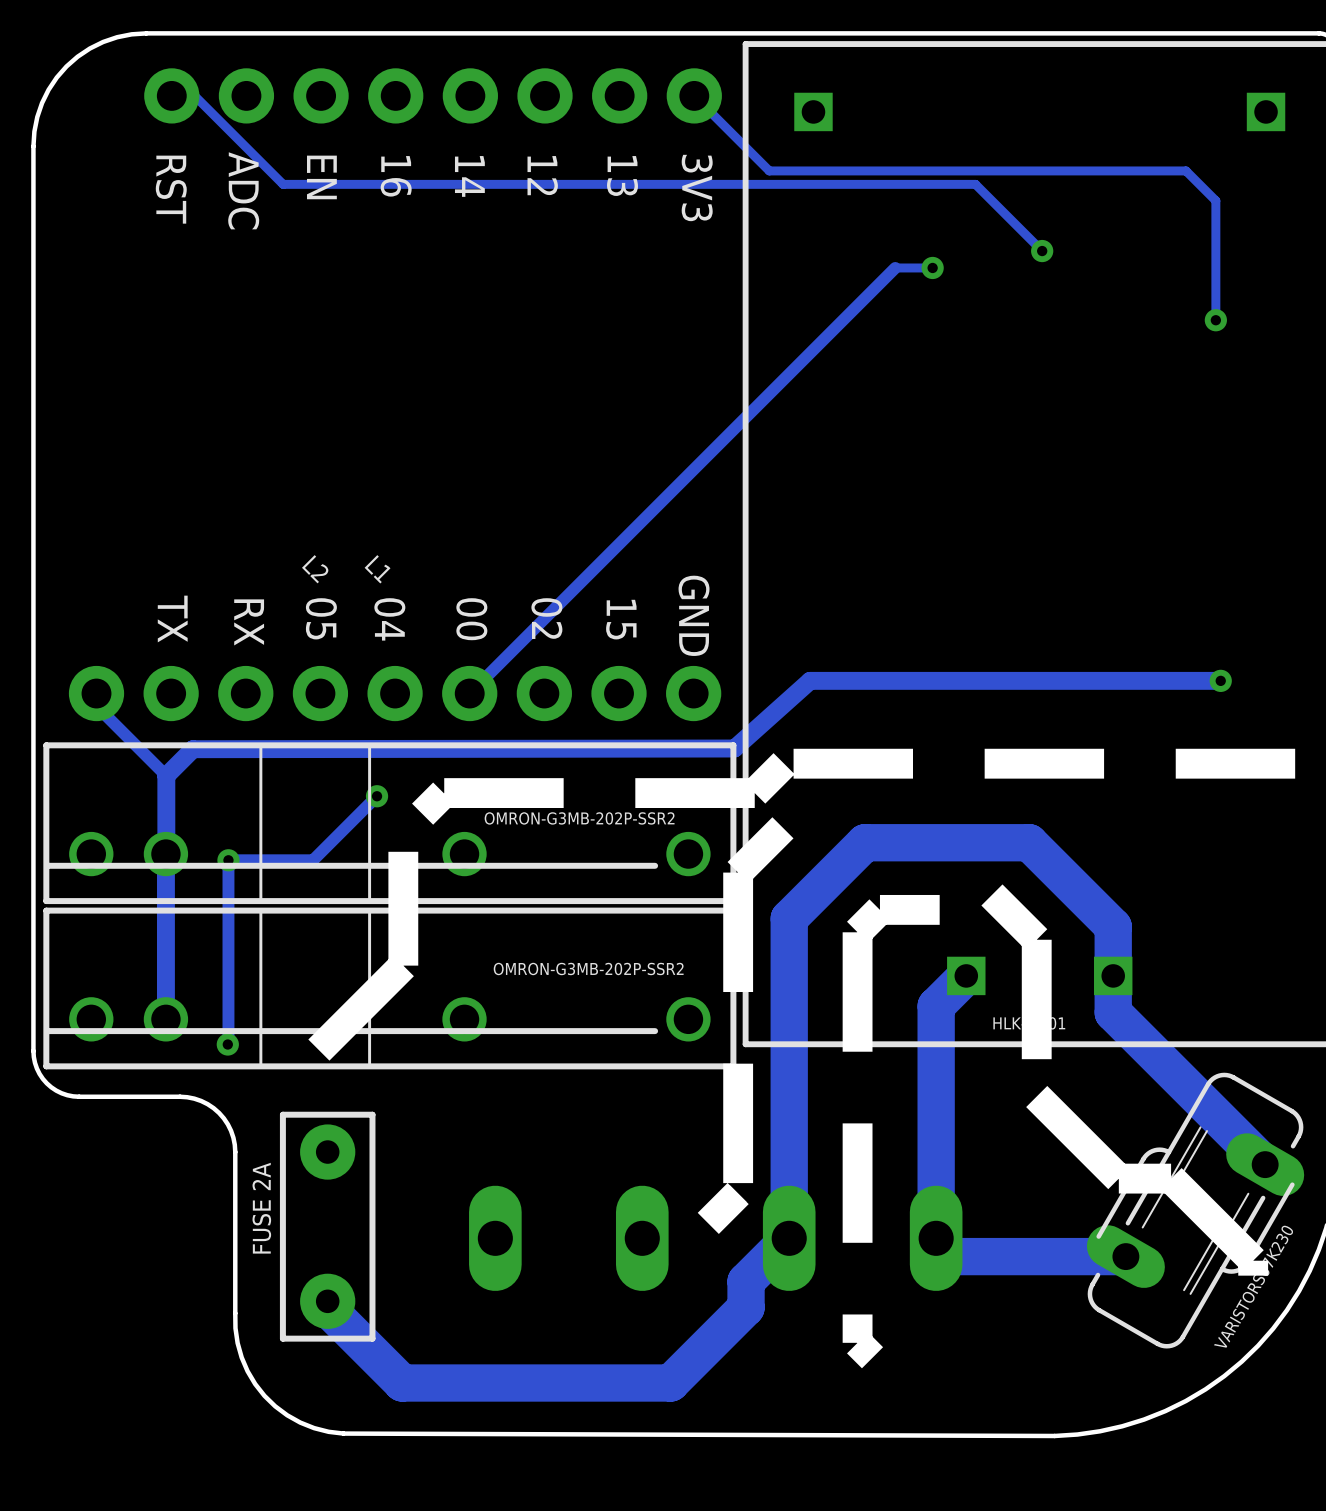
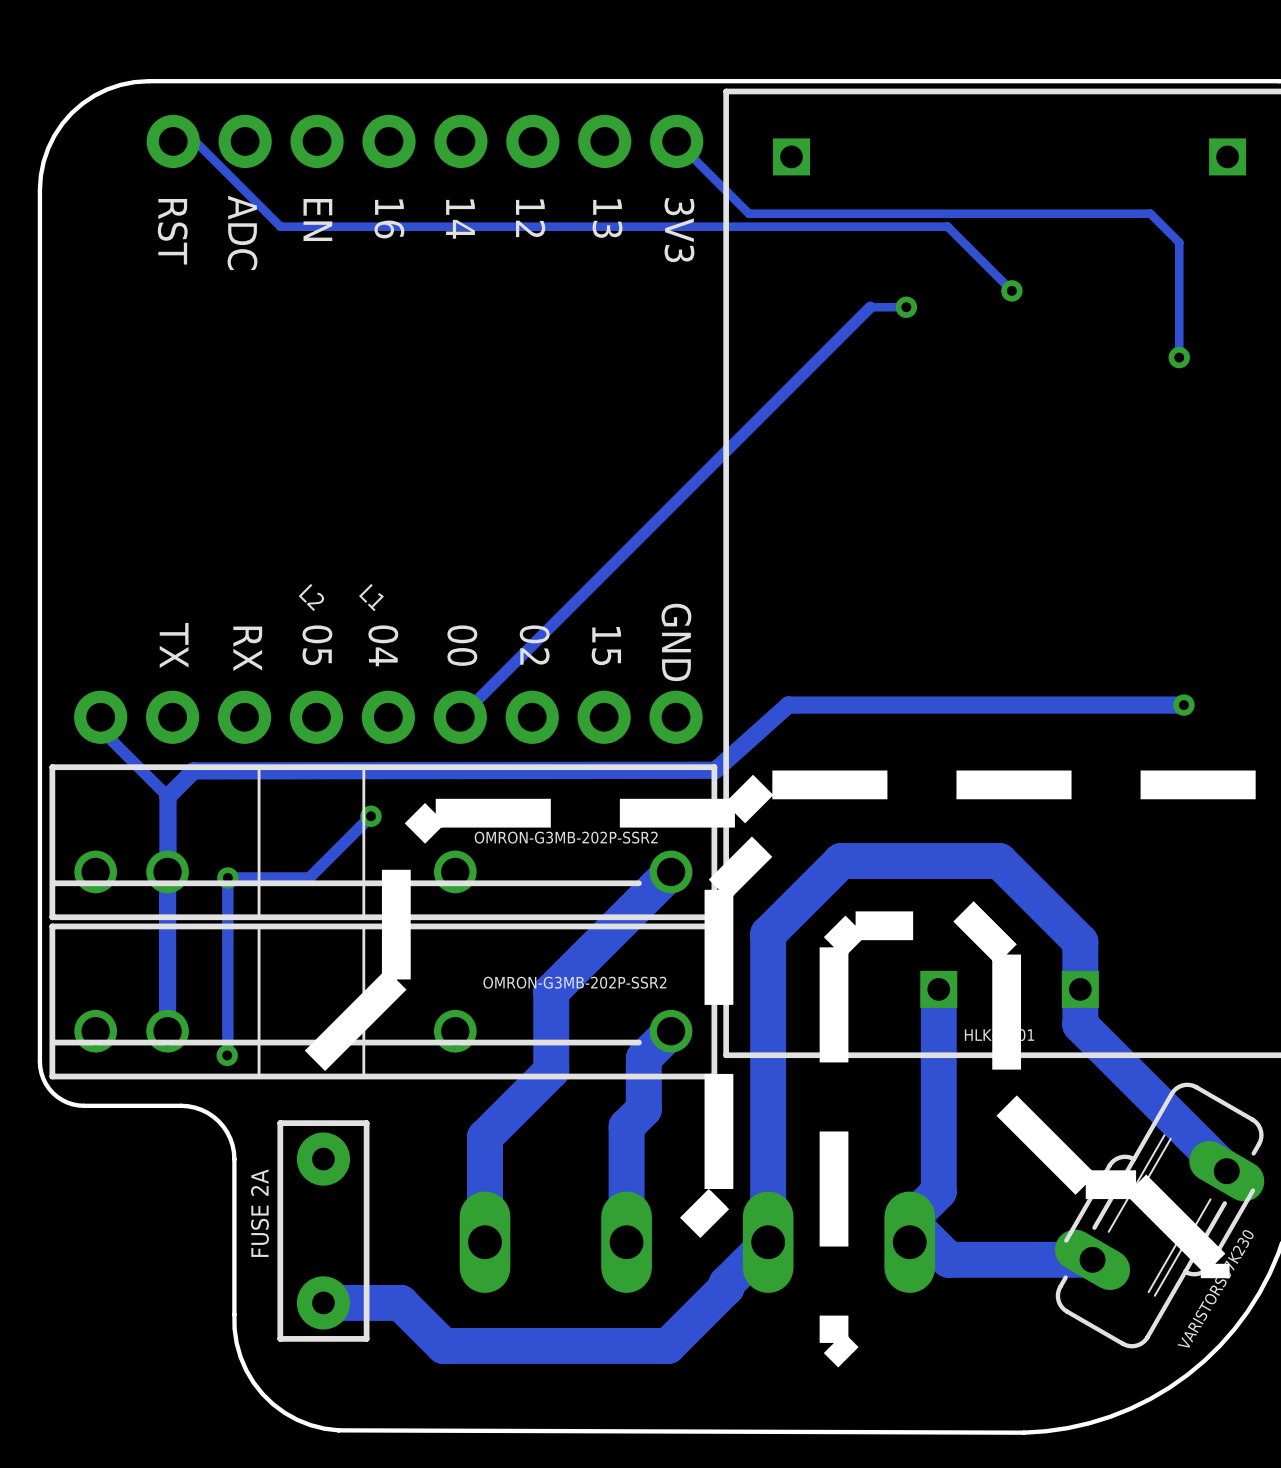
track: none -> (671, 871) (551, 991) (551, 1070) (485, 1137) (485, 1220)
track: (966, 975) (936, 1006) (936, 1238) (954, 1256) (976, 1256) -> (938, 989) (938, 1191) (909, 1220) (948, 1259)
track: none -> (671, 1031) (643, 1058) (643, 1109) (626, 1126) (626, 1220)
track: (746, 1285) (746, 1307) (670, 1383) (402, 1383) (327, 1308) (327, 1301) -> (726, 1287) (667, 1345) (443, 1345) (400, 1302) (323, 1302)

